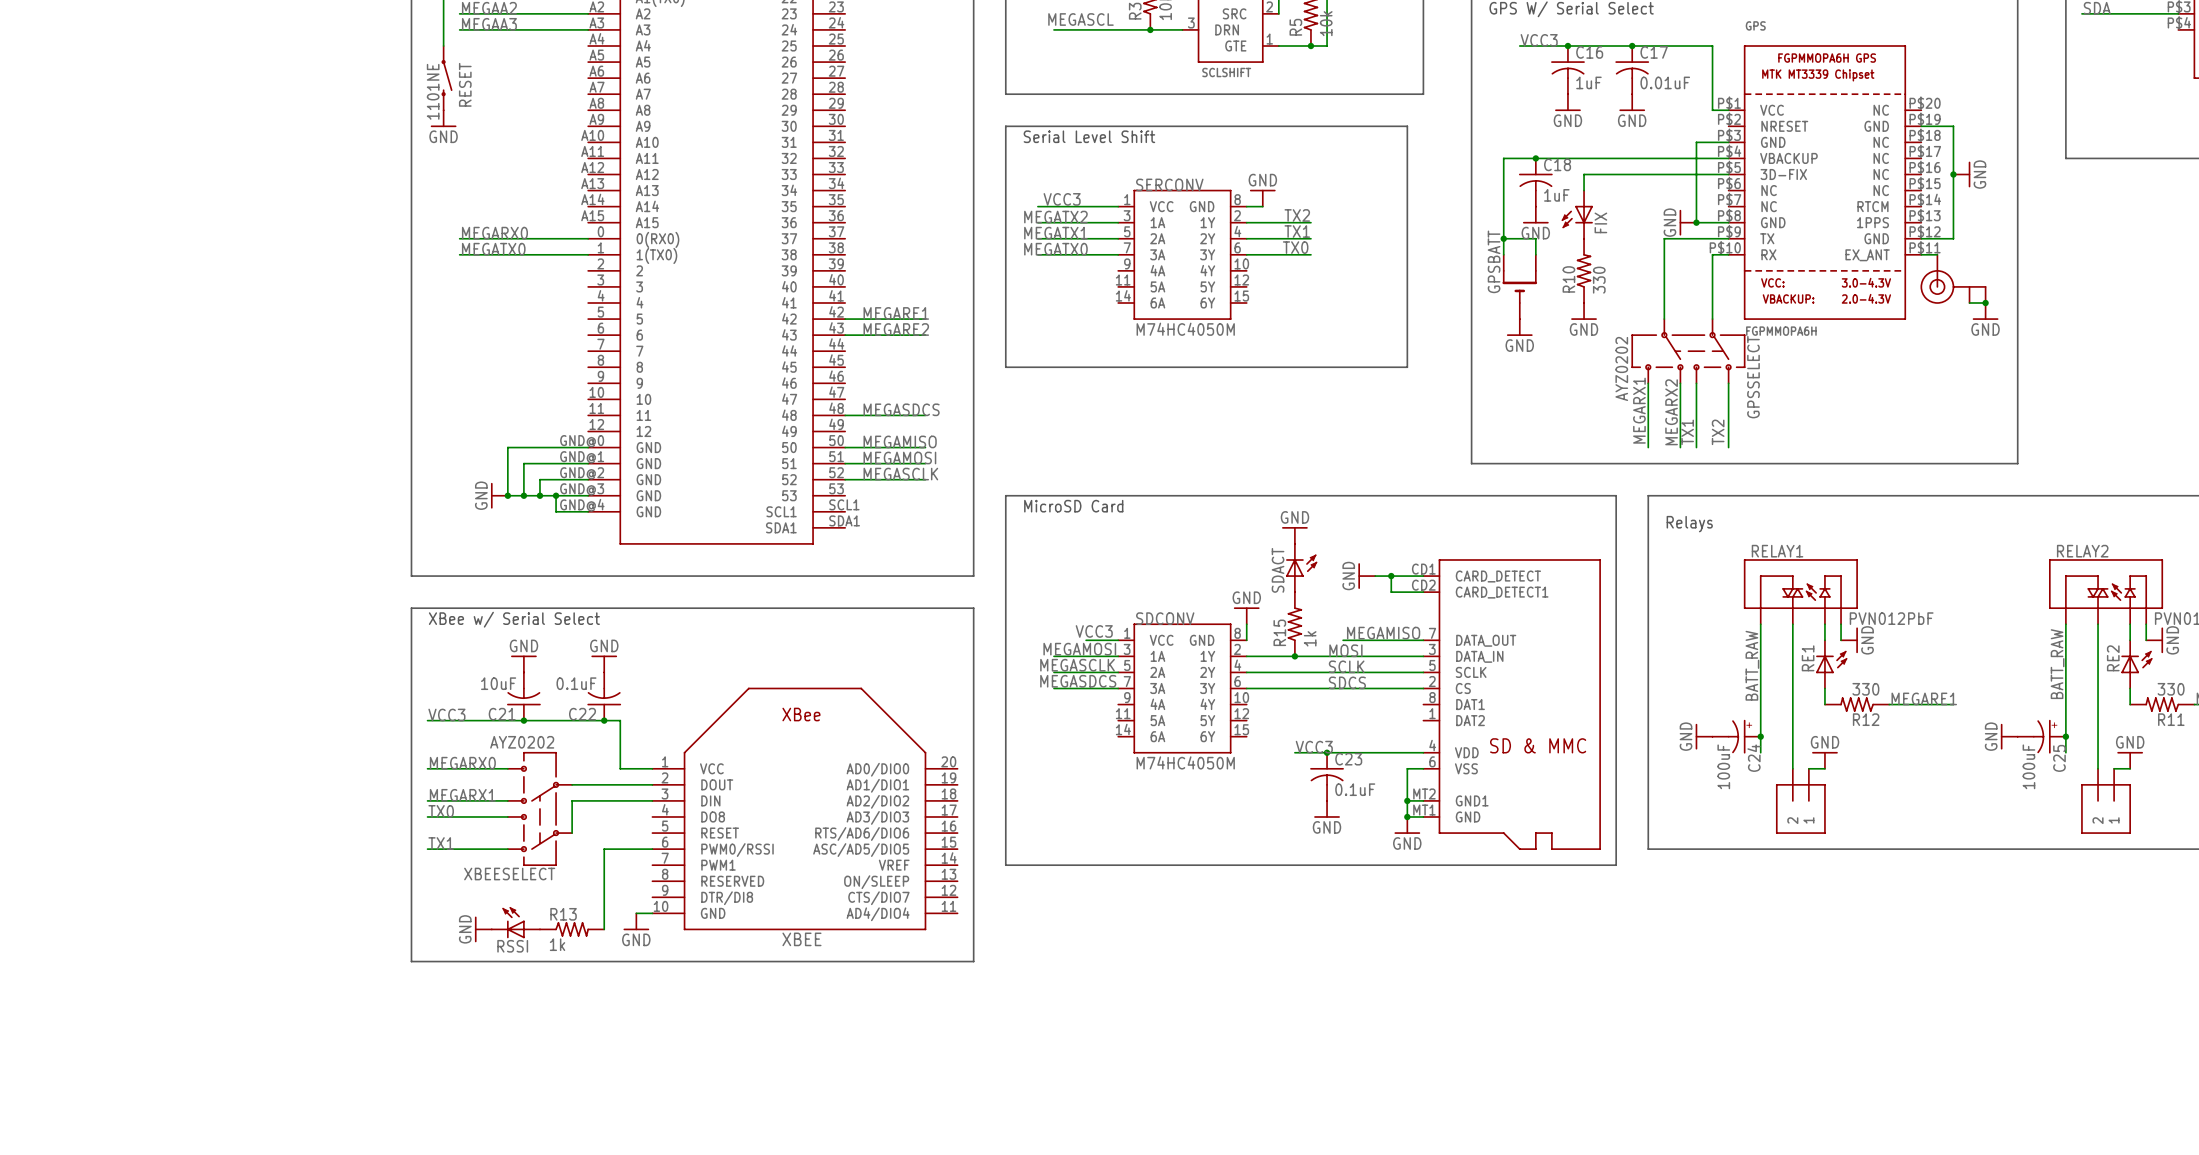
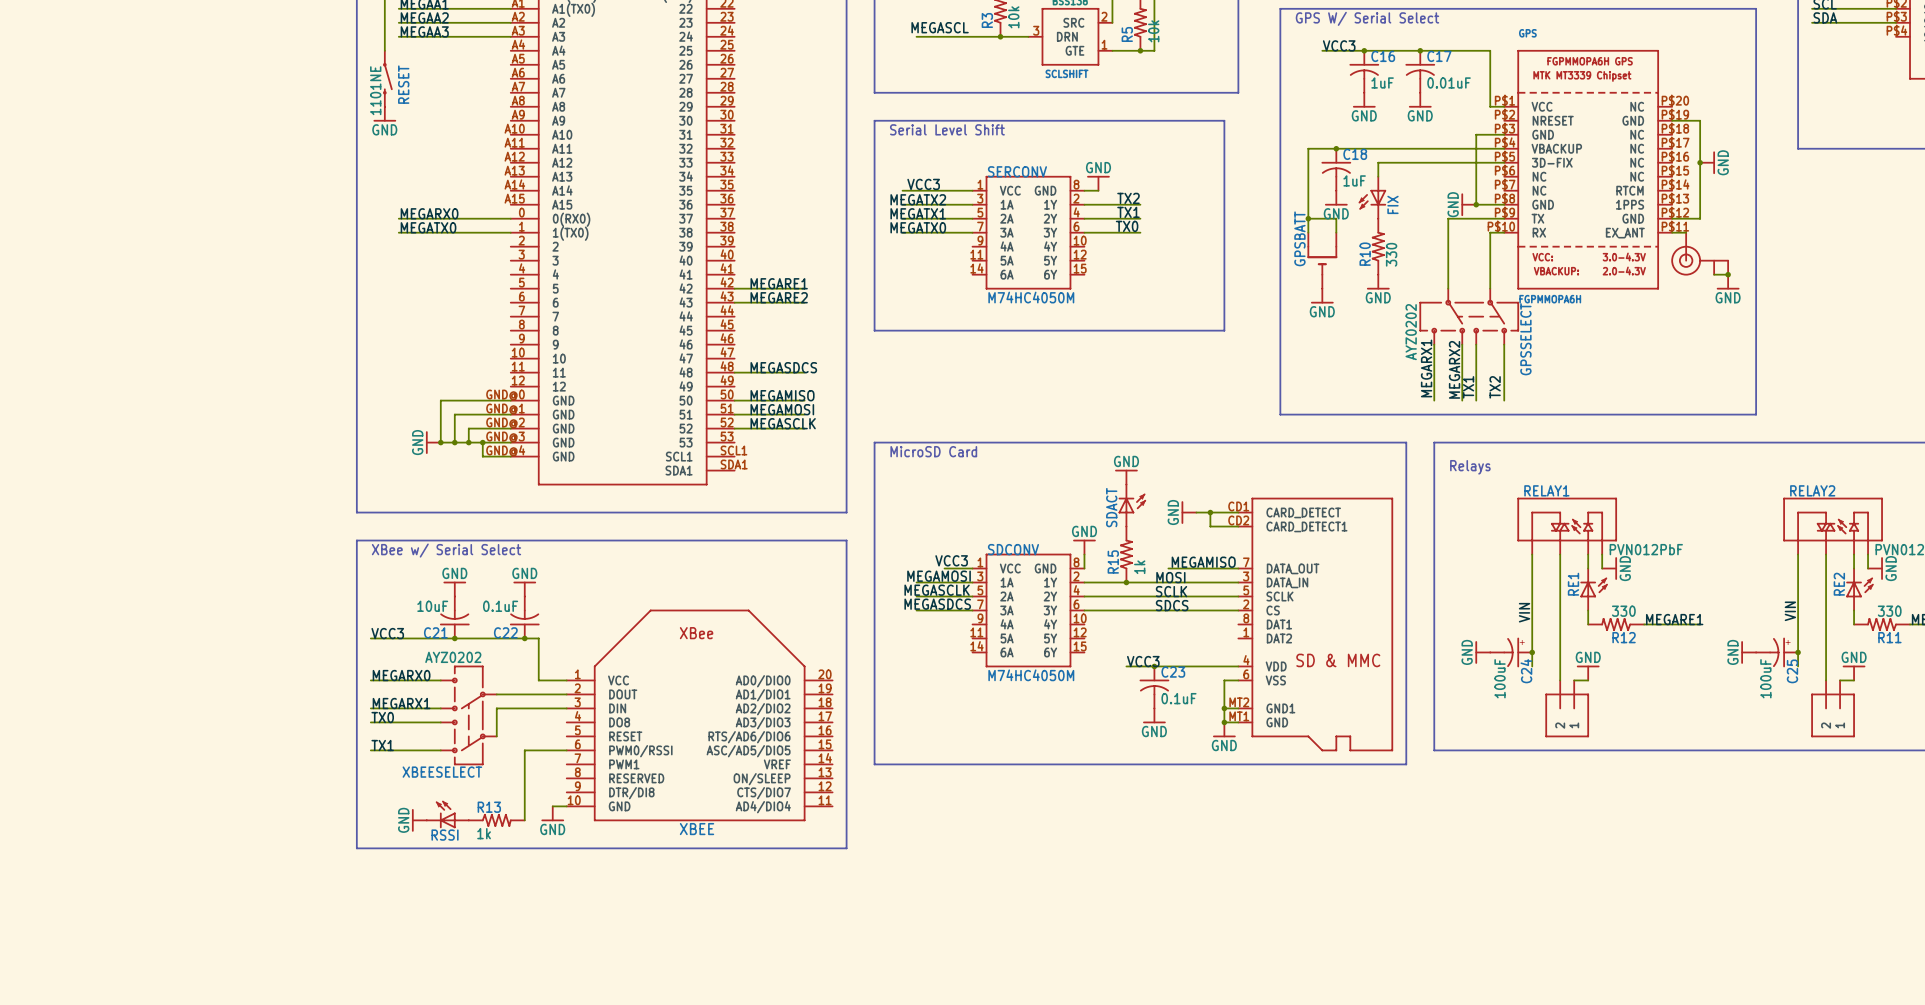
label: BATT_RAW (2057, 664) -> VIN (1790, 611)
label: BATT_RAW (1752, 665) -> VIN (1524, 612)

